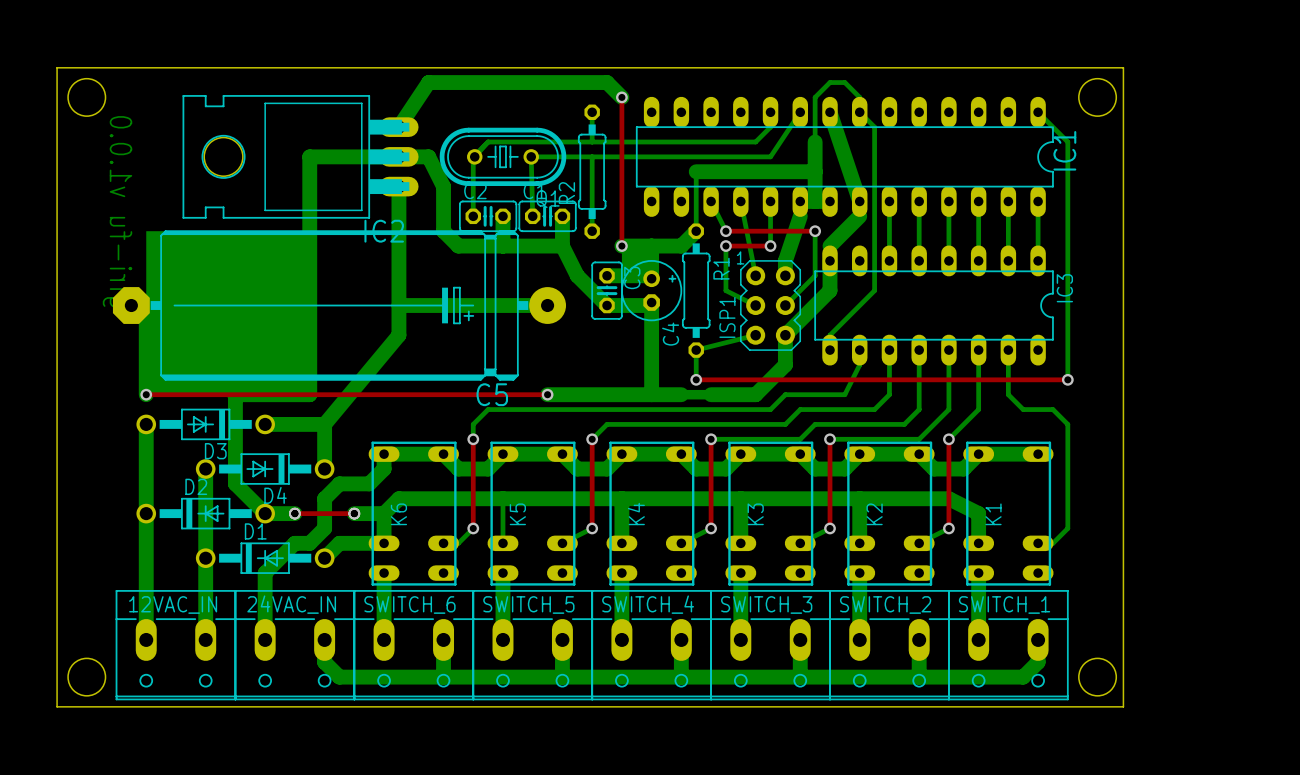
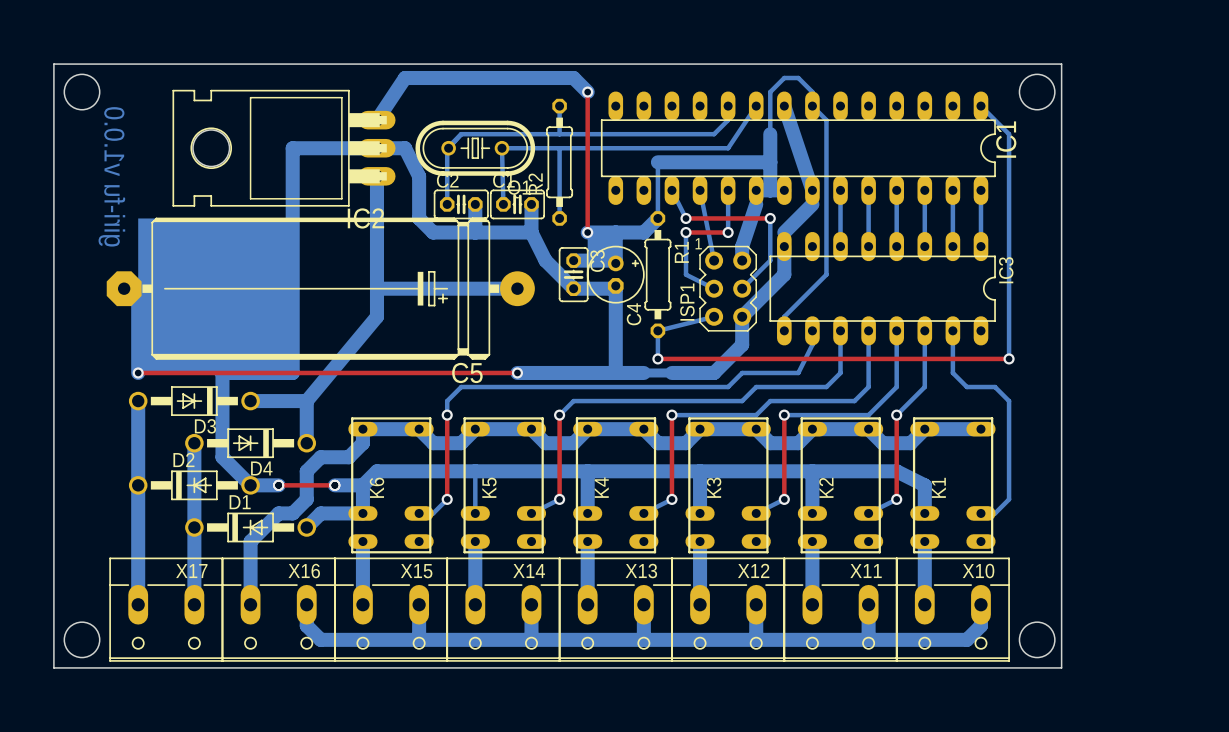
12VAC_IN name: 12VAC_IN (173, 604) -> X17 (191, 571)
24VAC_IN name: 24VAC_IN (291, 604) -> X16 (304, 571)
SWITCH_6 name: SWITCH_6 (409, 604) -> X15 (416, 571)
SWITCH_5 name: SWITCH_5 (528, 604) -> X14 (529, 571)
SWITCH_4 name: SWITCH_4 (648, 604) -> X13 (641, 571)
SWITCH_3 name: SWITCH_3 (766, 604) -> X12 (753, 570)
SWITCH_2 name: SWITCH_2 (885, 604) -> X11 (866, 571)
SWITCH_1 name: SWITCH_1 (1004, 604) -> X10 (978, 571)

